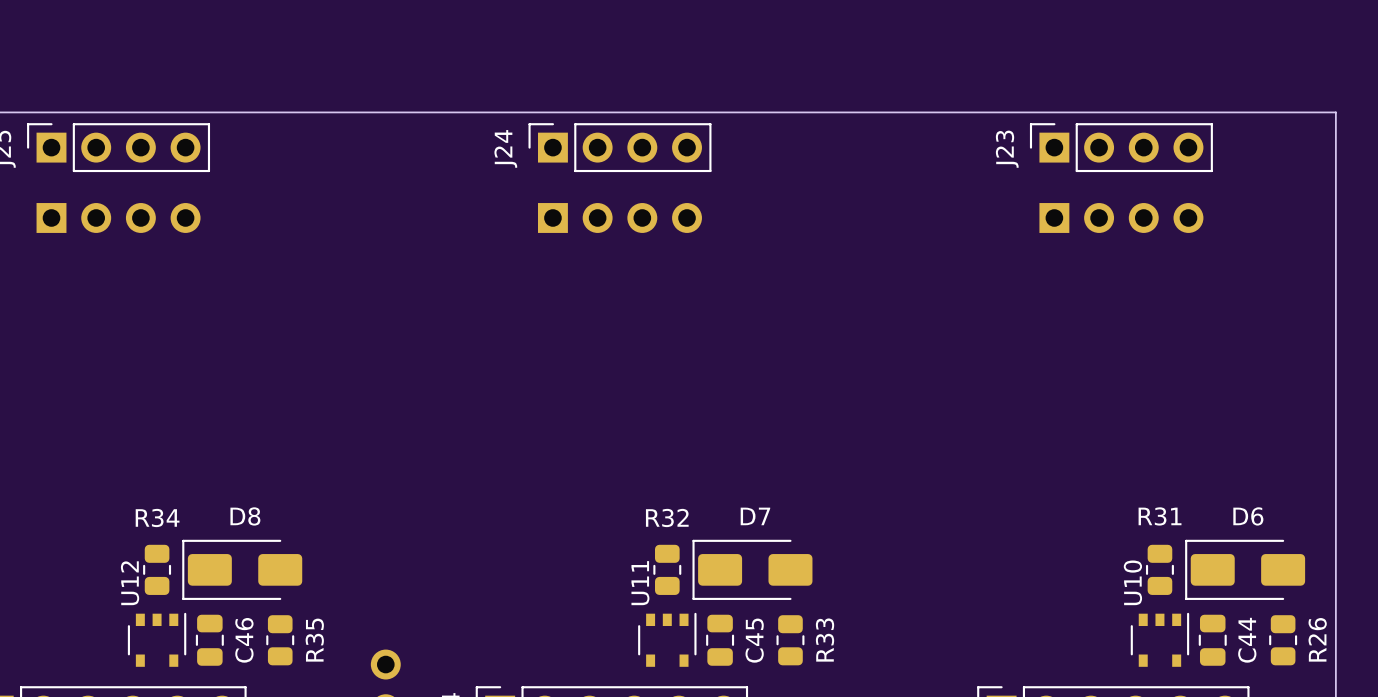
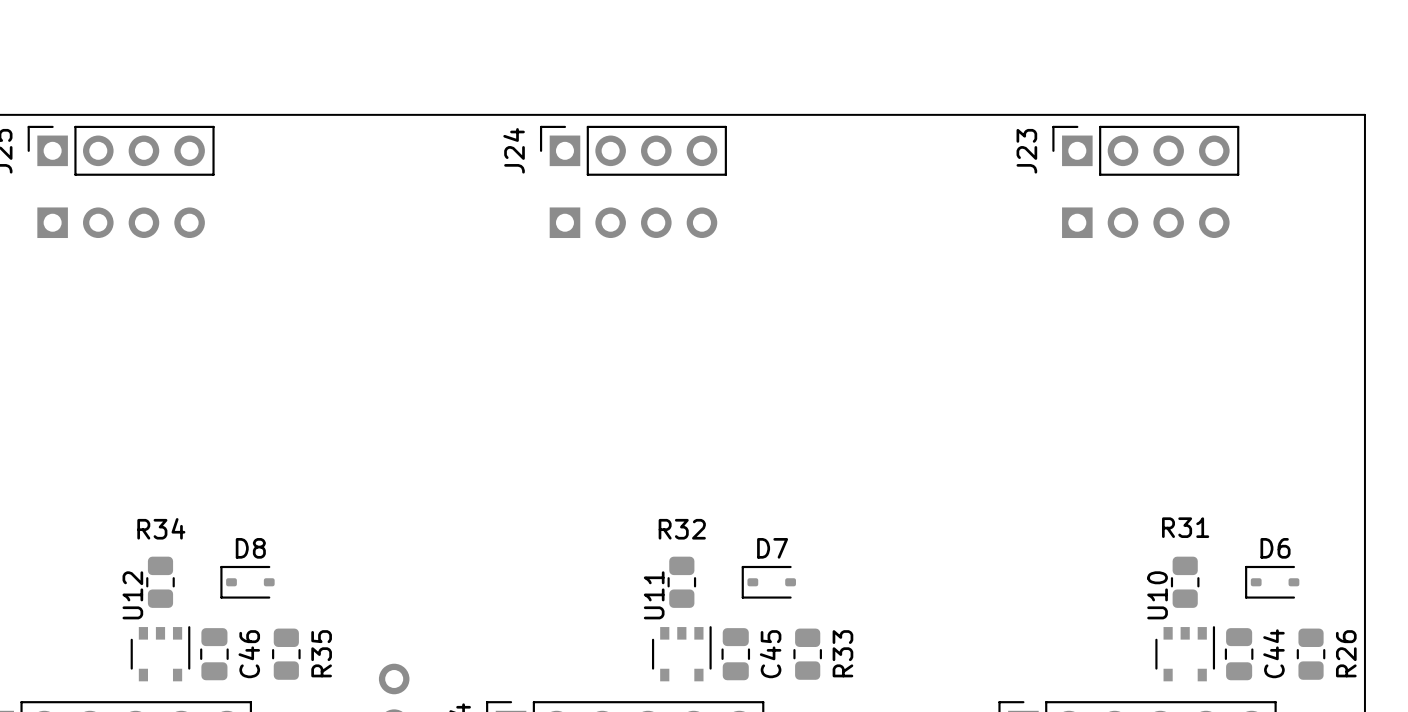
D8 footprint: [182, 539, 303, 600] -> [220, 565, 275, 599]
D7 footprint: [692, 539, 813, 600] -> [741, 565, 796, 599]
D6 footprint: [1185, 539, 1306, 600] -> [1245, 565, 1300, 599]

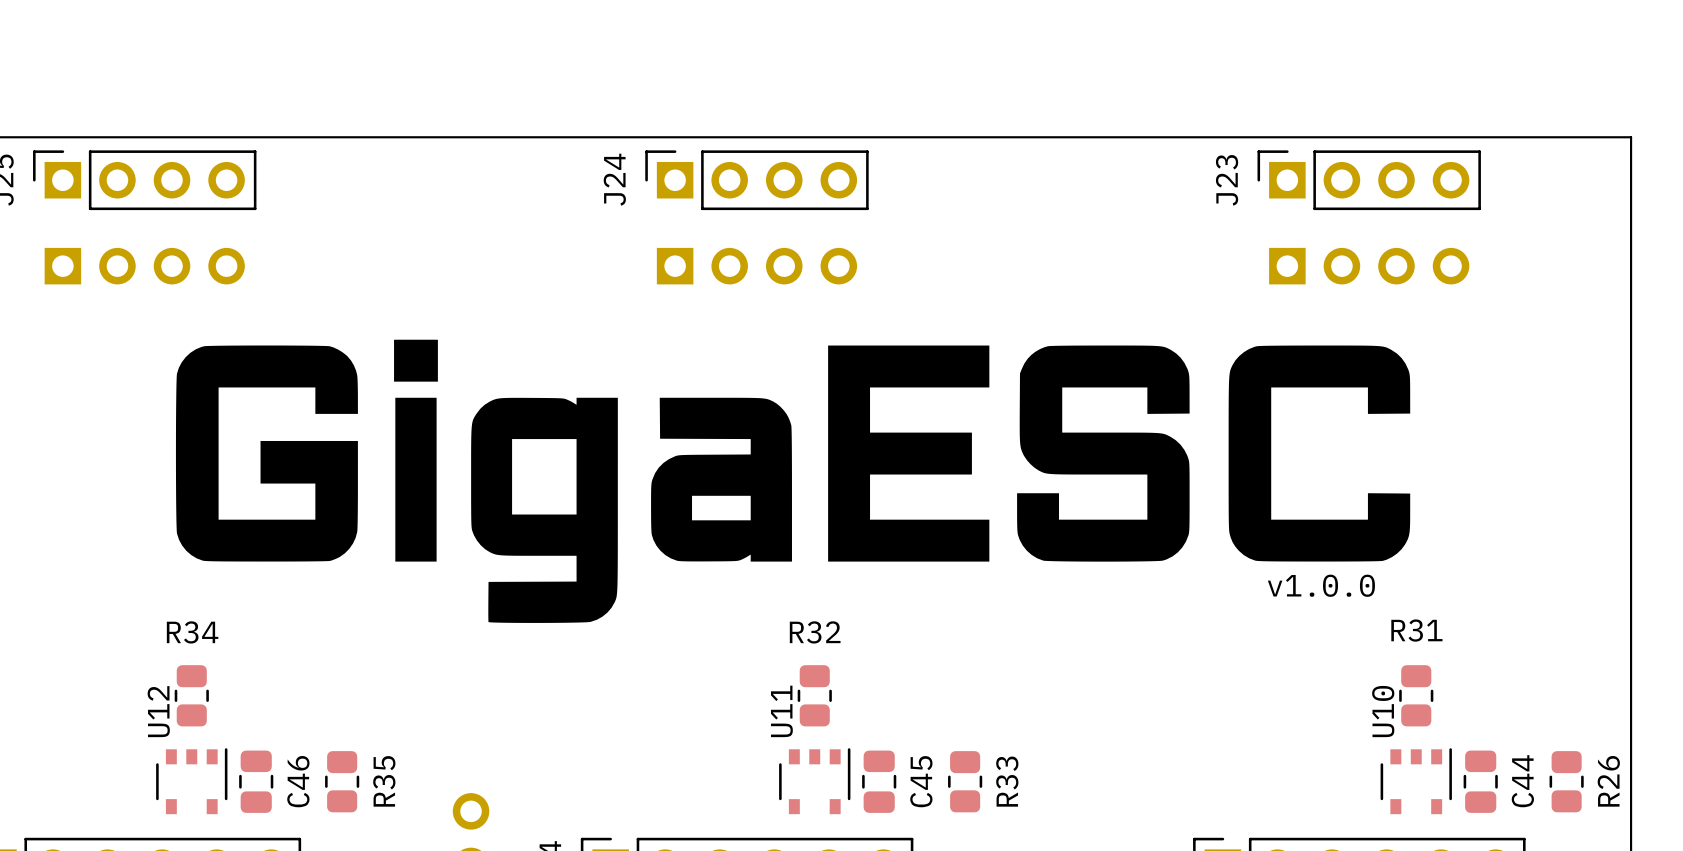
drawing: none -> [175, 339, 1411, 623]
text: none -> v1.0.0 (1321, 585)
D8: (247, 582) -> none
D7: (768, 582) -> none
D6: (1272, 582) -> none

